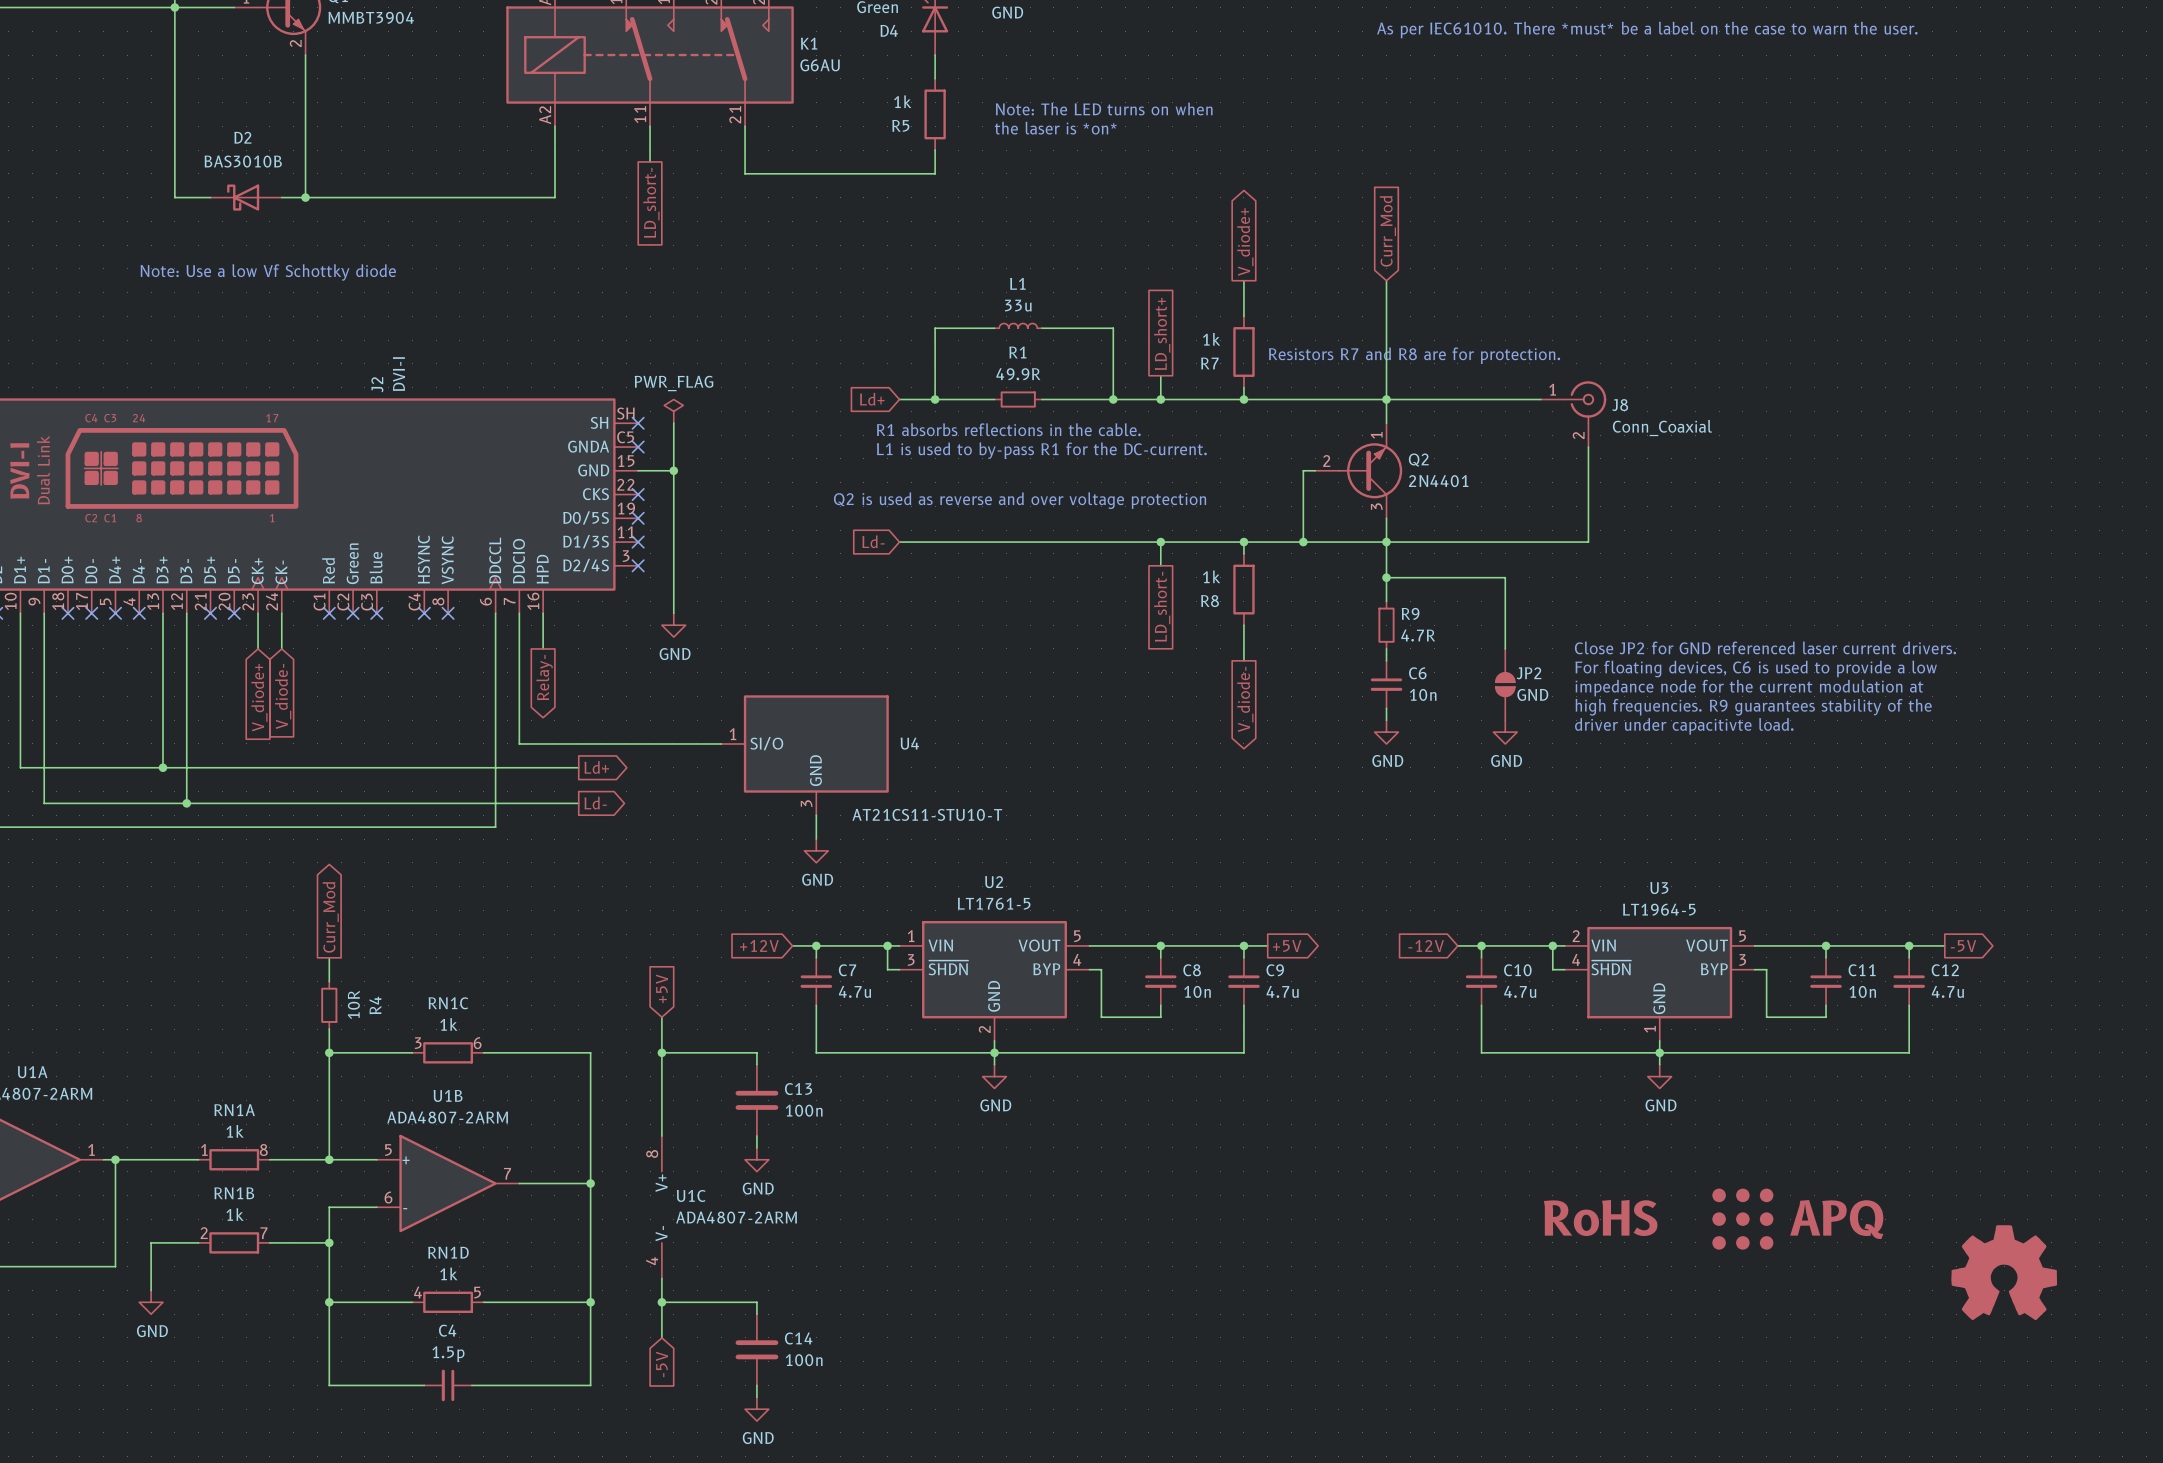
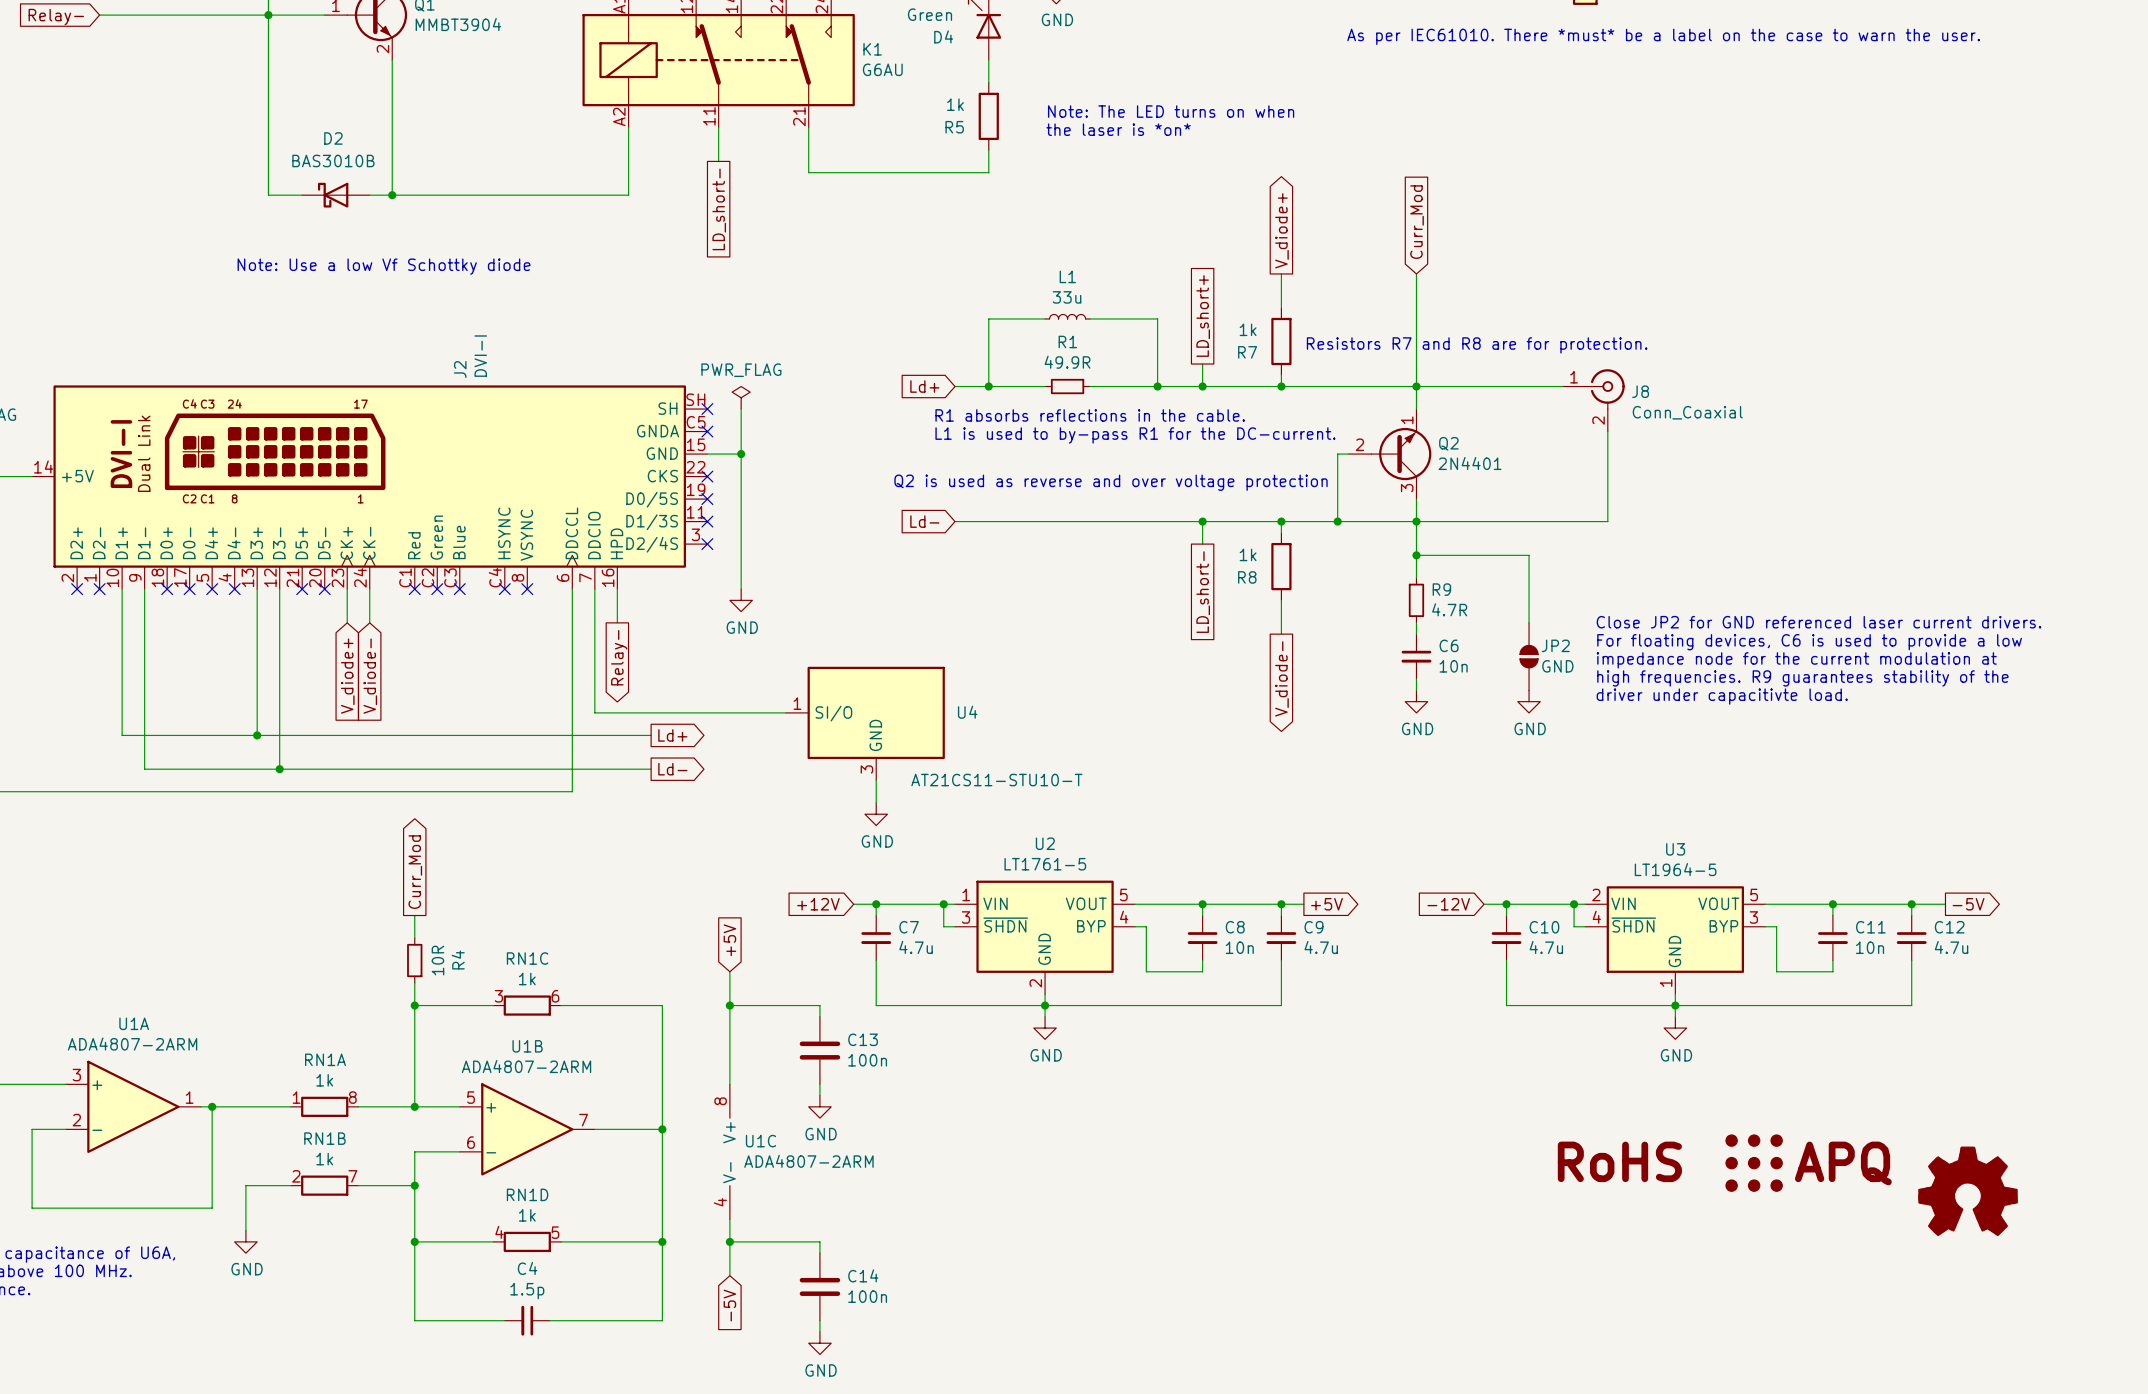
part position: (2004, 1272) -> (1967, 1191)

